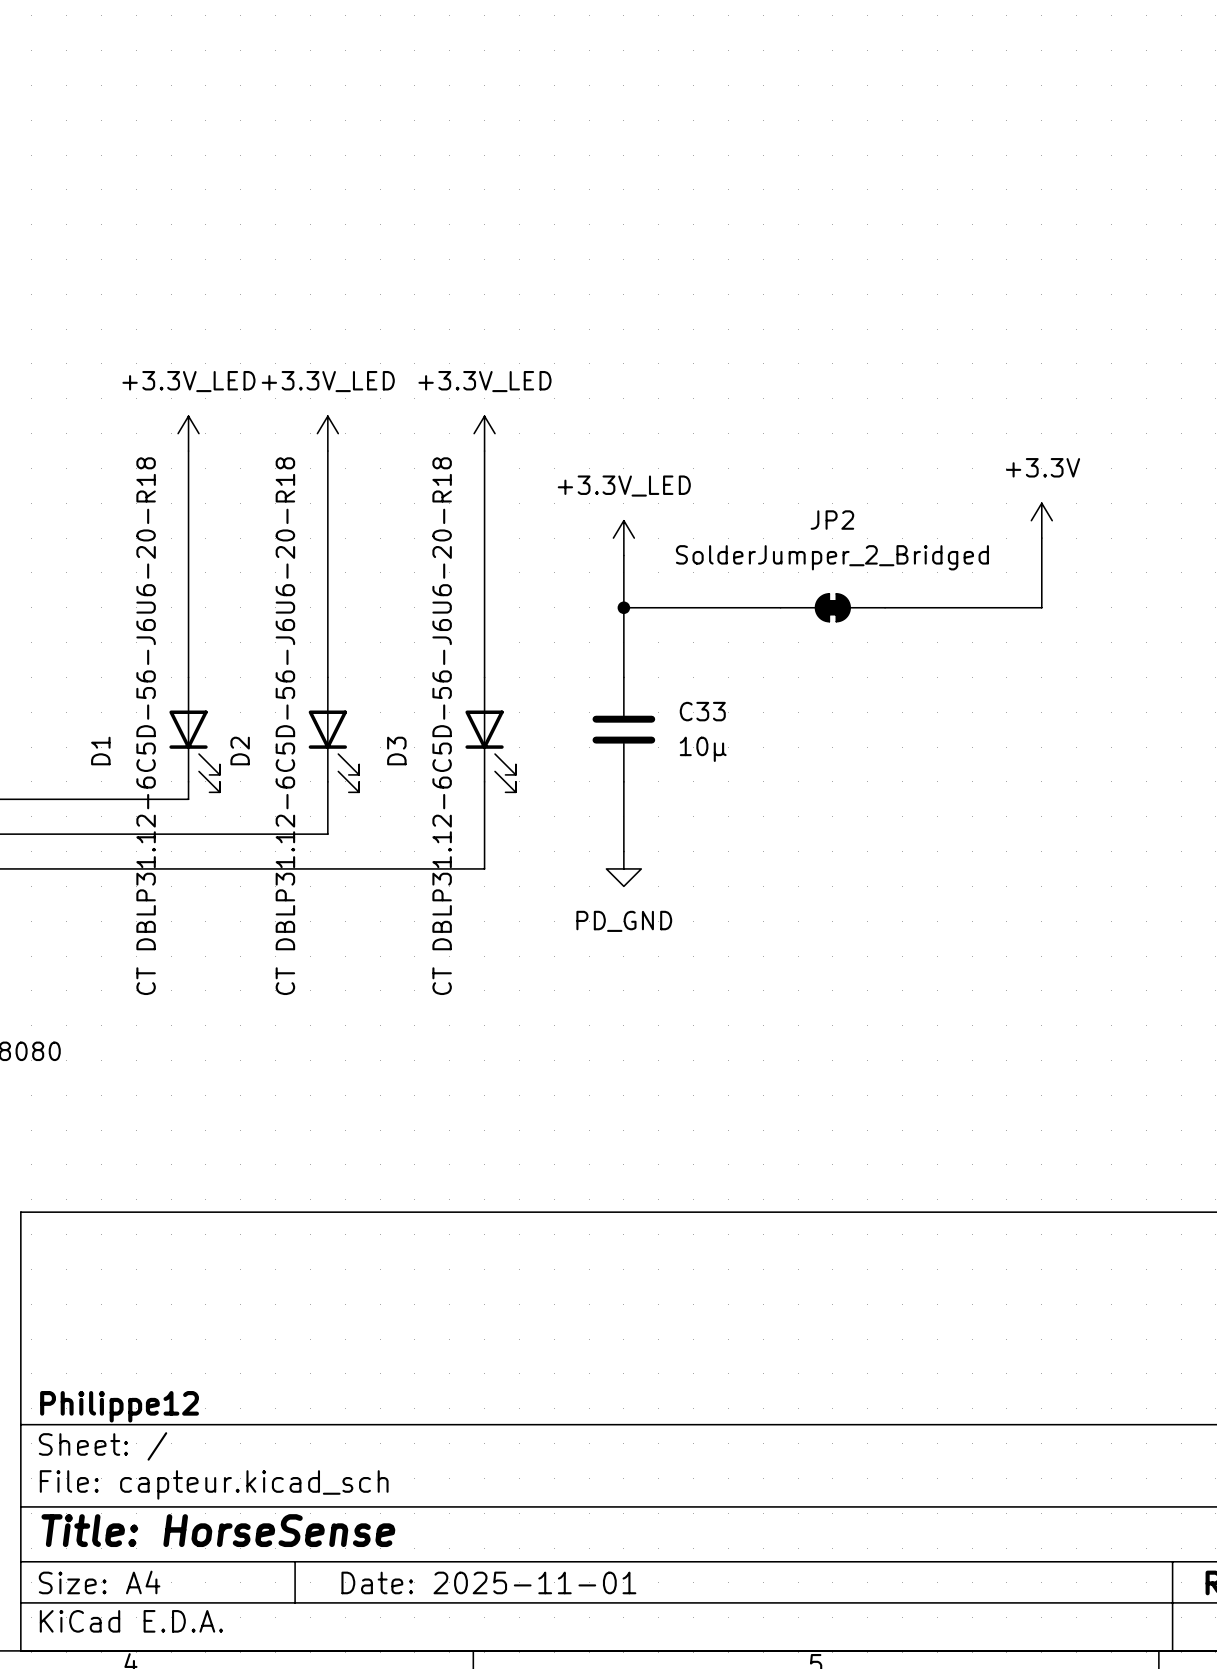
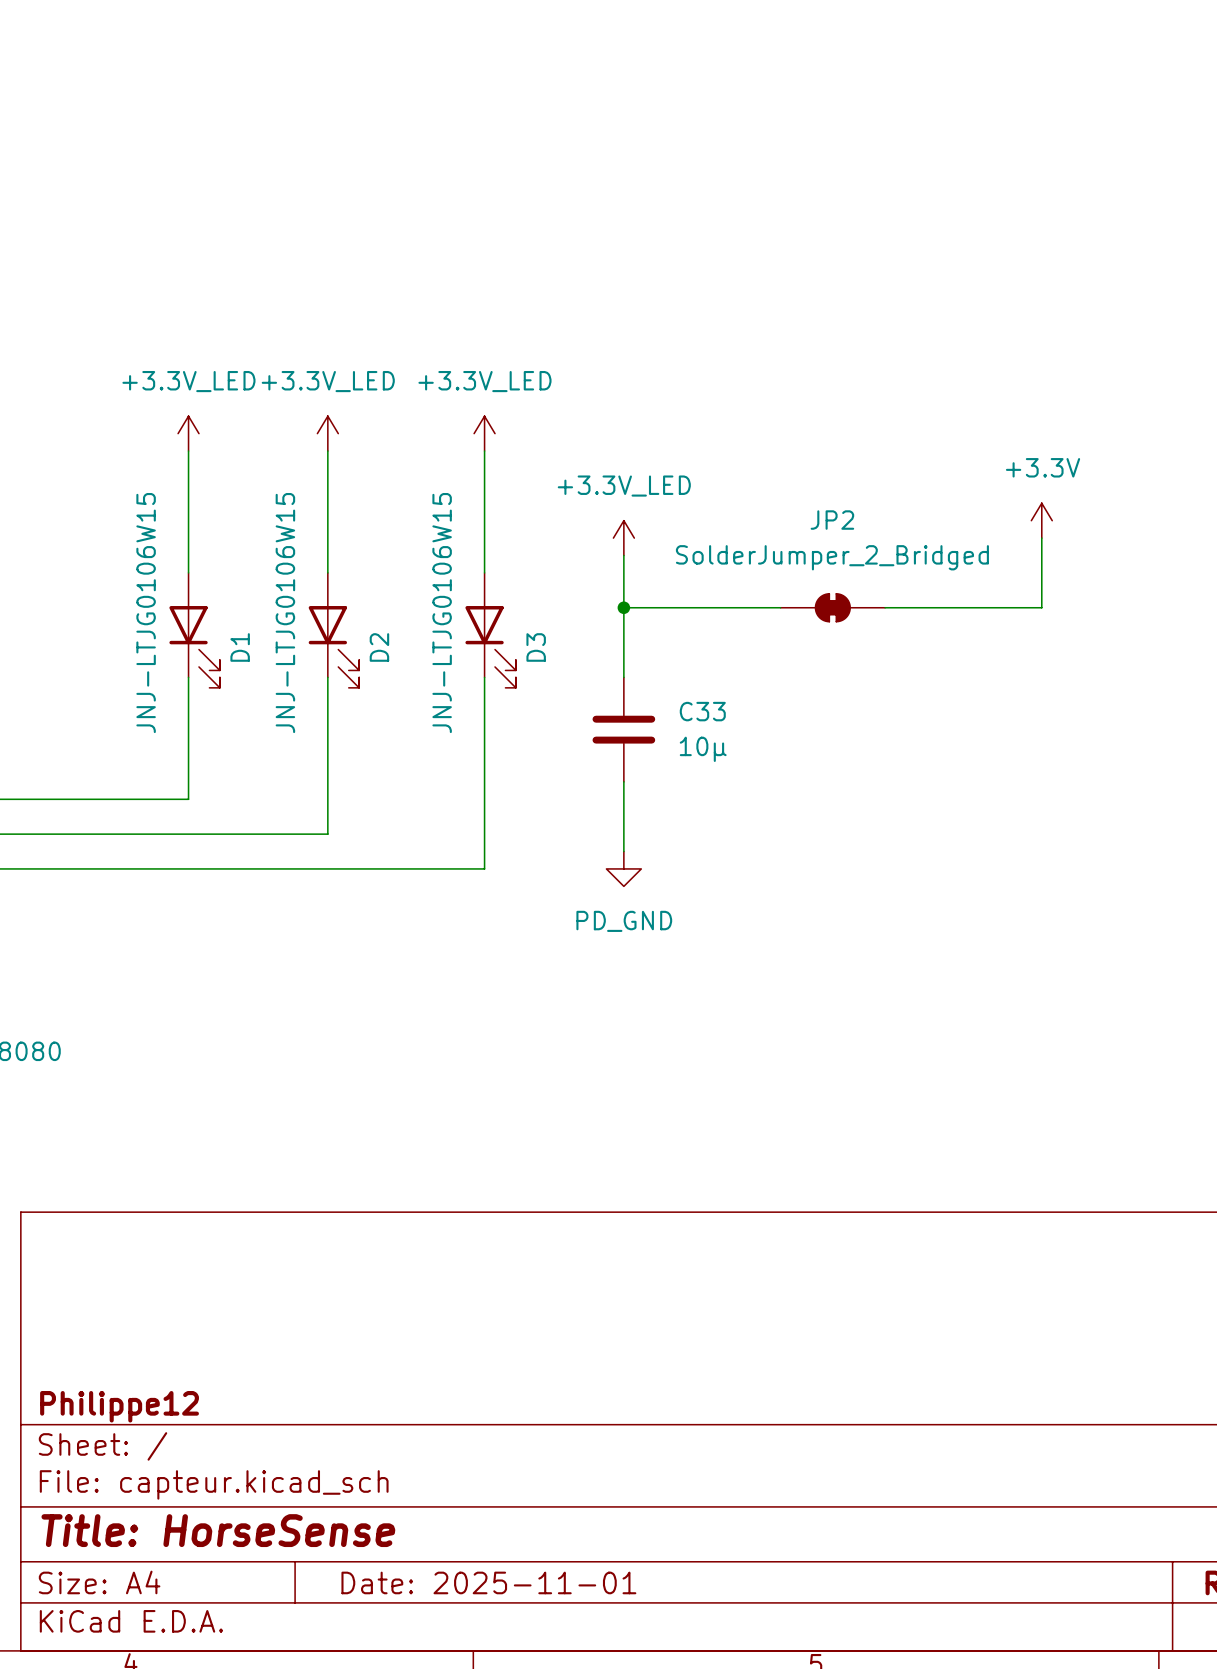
D1 value: CT DBLP31.12-6C5D-56-J6U6-20-R18 (146, 726) -> JNJ-LTJG0106W15 (146, 613)
D2 value: CT DBLP31.12-6C5D-56-J6U6-20-R18 (285, 726) -> JNJ-LTJG0106W15 (285, 613)
D3 value: CT DBLP31.12-6C5D-56-J6U6-20-R18 (442, 726) -> JNJ-LTJG0106W15 (442, 613)
D1 position: (194, 734) -> (194, 630)
D2 position: (333, 734) -> (333, 630)
D3 position: (490, 734) -> (490, 630)
D1 name position: D1 (100, 751) -> D1 (240, 647)
D2 name position: D2 (240, 751) -> D2 (379, 647)
D3 name position: D3 (396, 751) -> D3 (536, 647)

